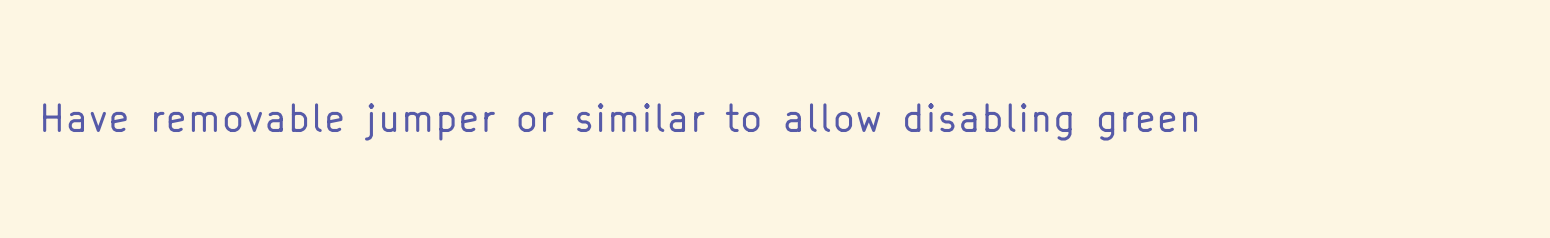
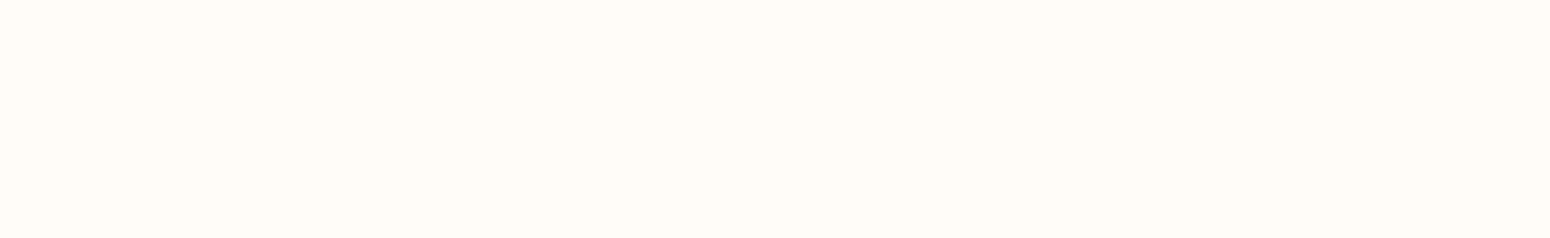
text: Have removable jumper or similar to allow disabling green (620, 121) -> none

